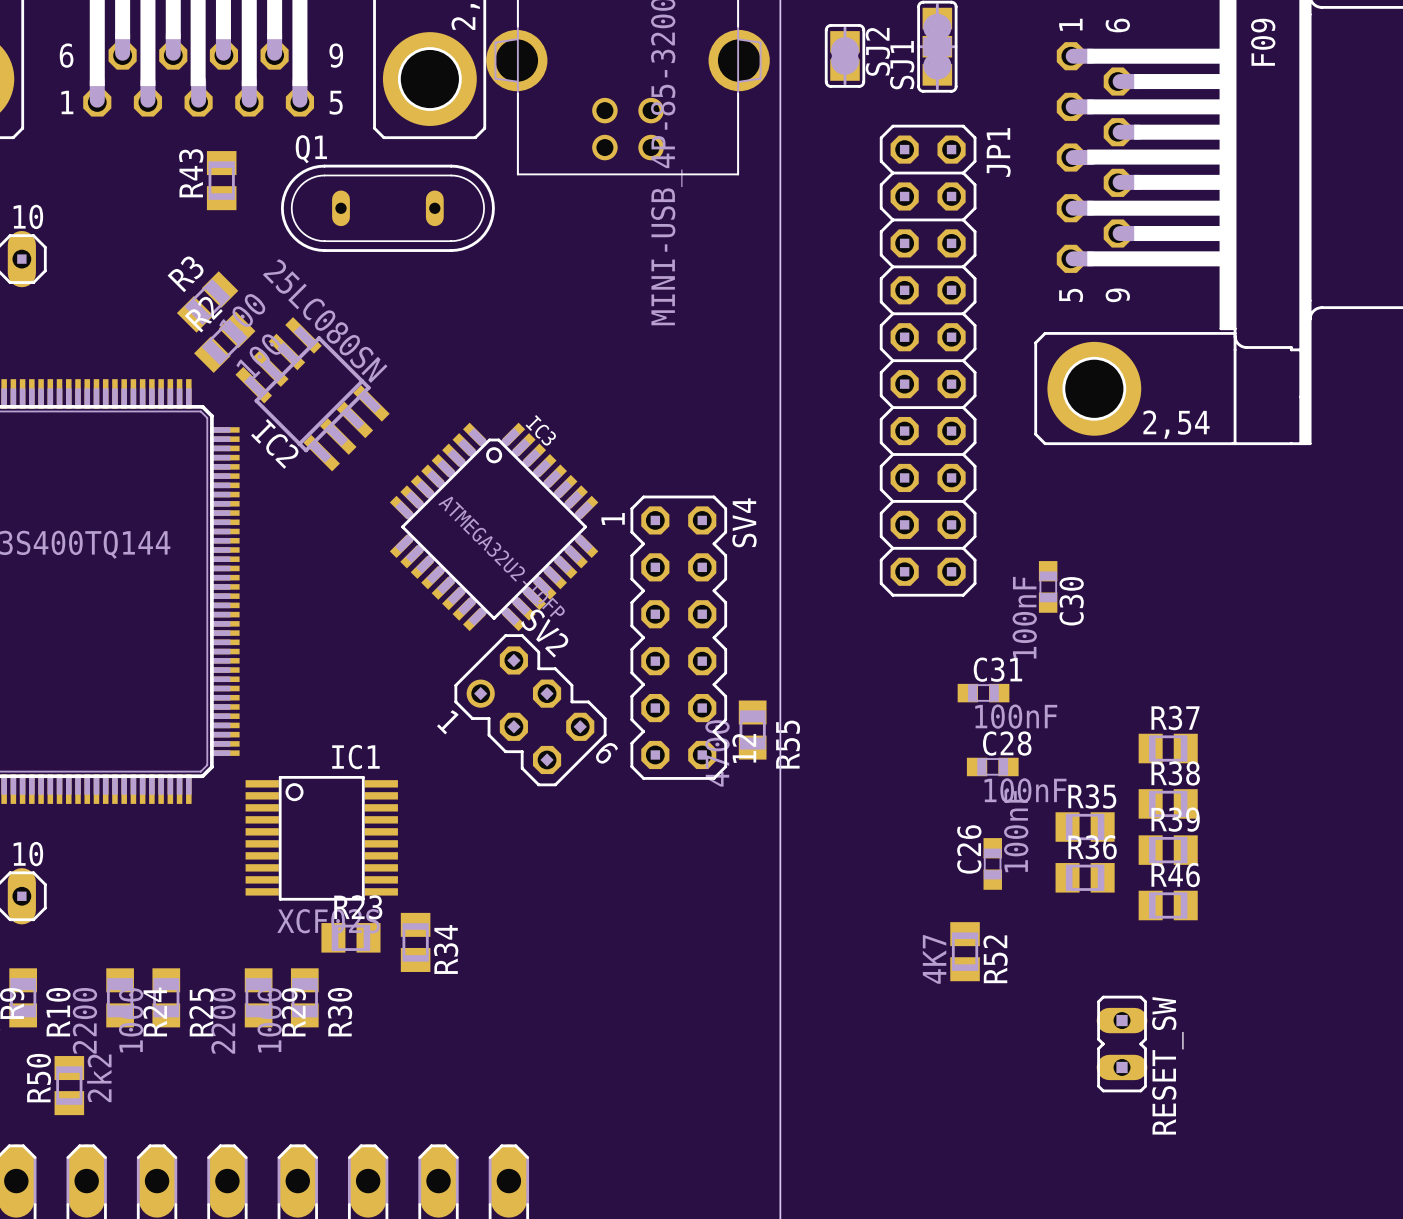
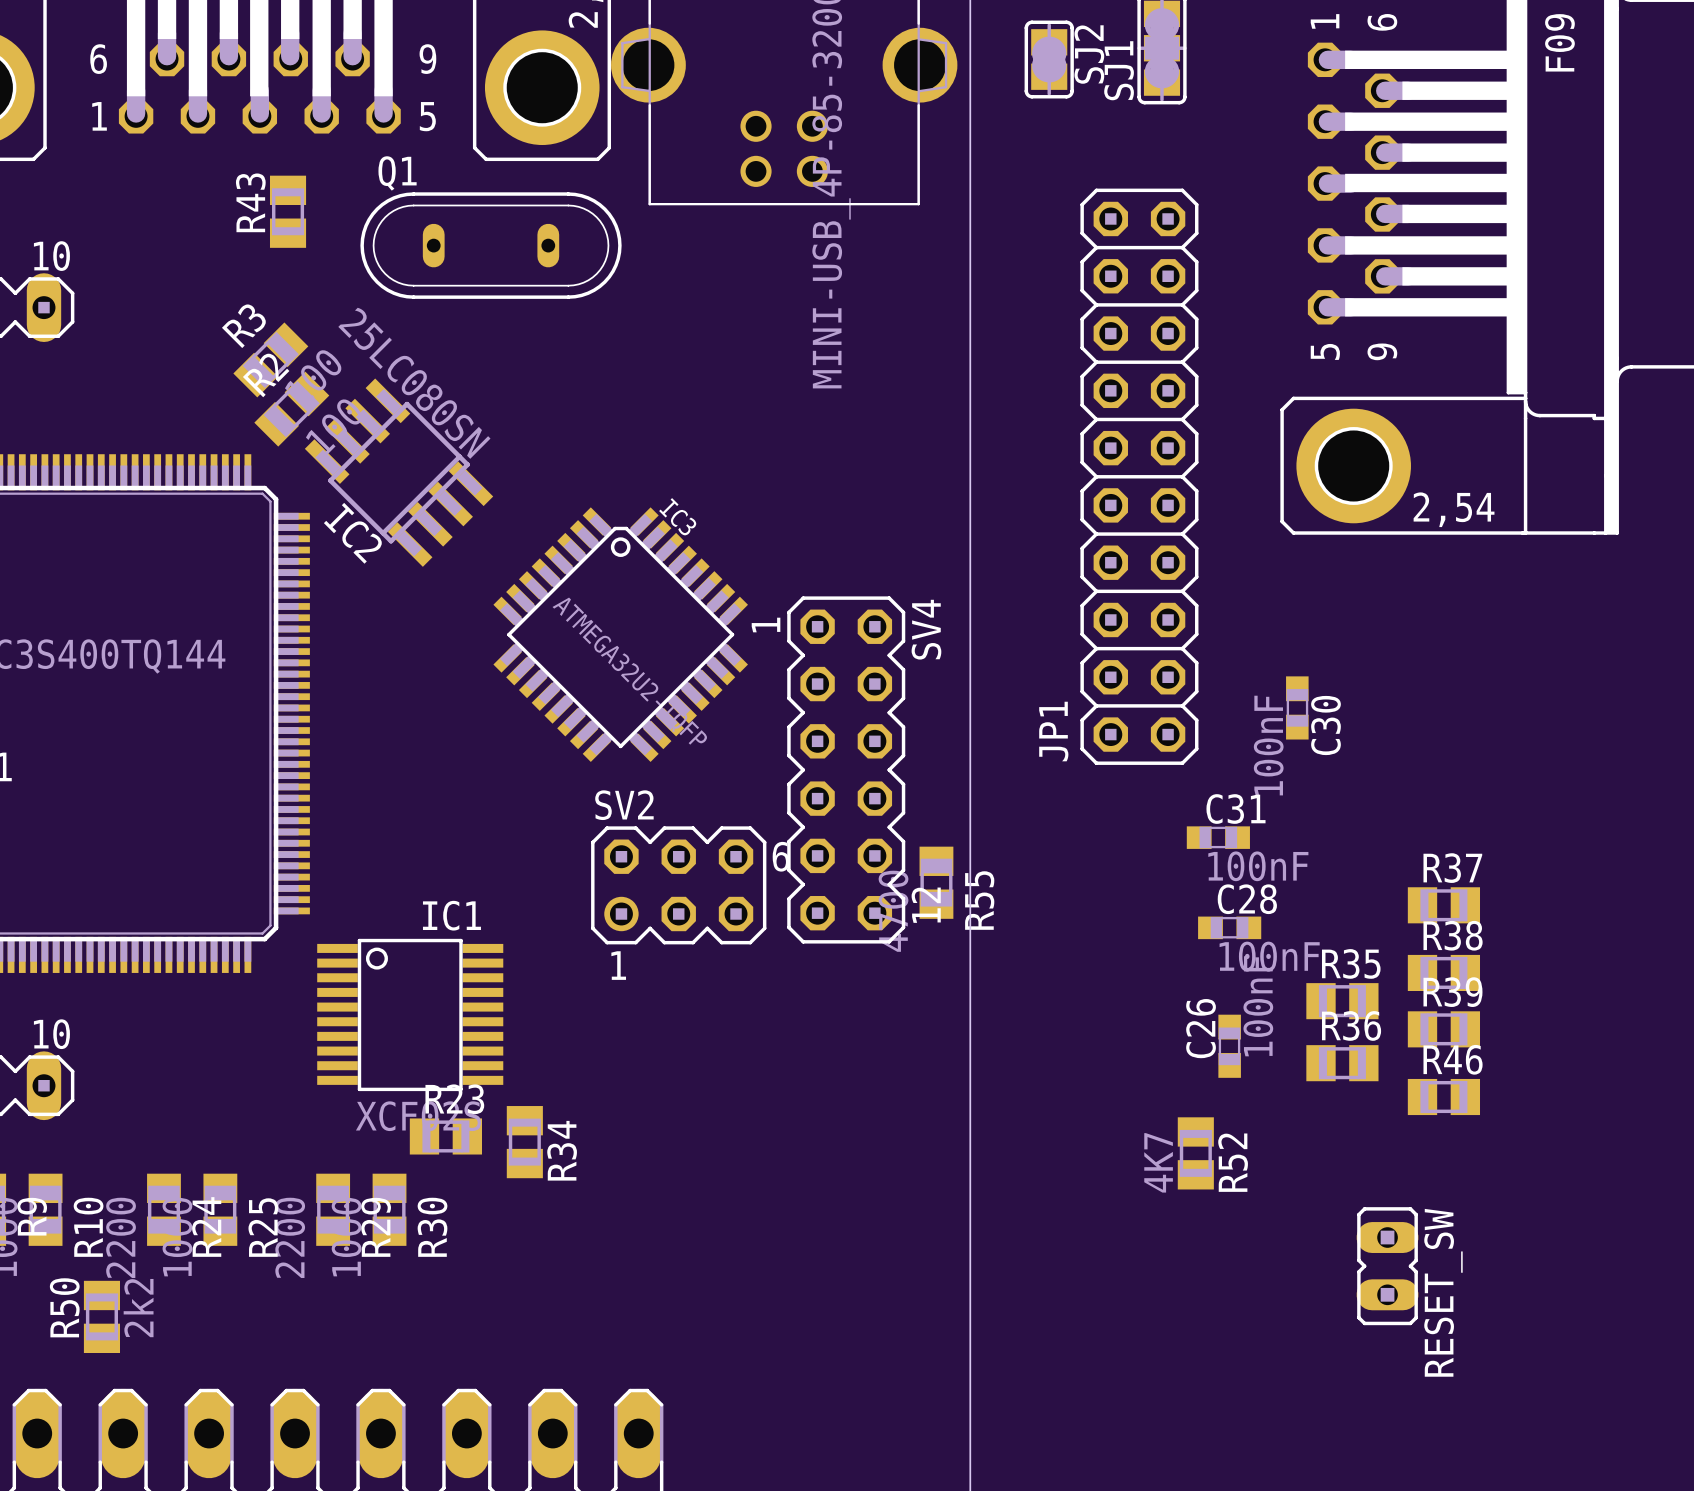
JP1 name position: JP1 (998, 152) -> JP1 (1053, 731)
JP1 position: (928, 360) -> (1139, 476)
SV2 rotation: 0° (530, 710) -> 45° counterclockwise (678, 885)

